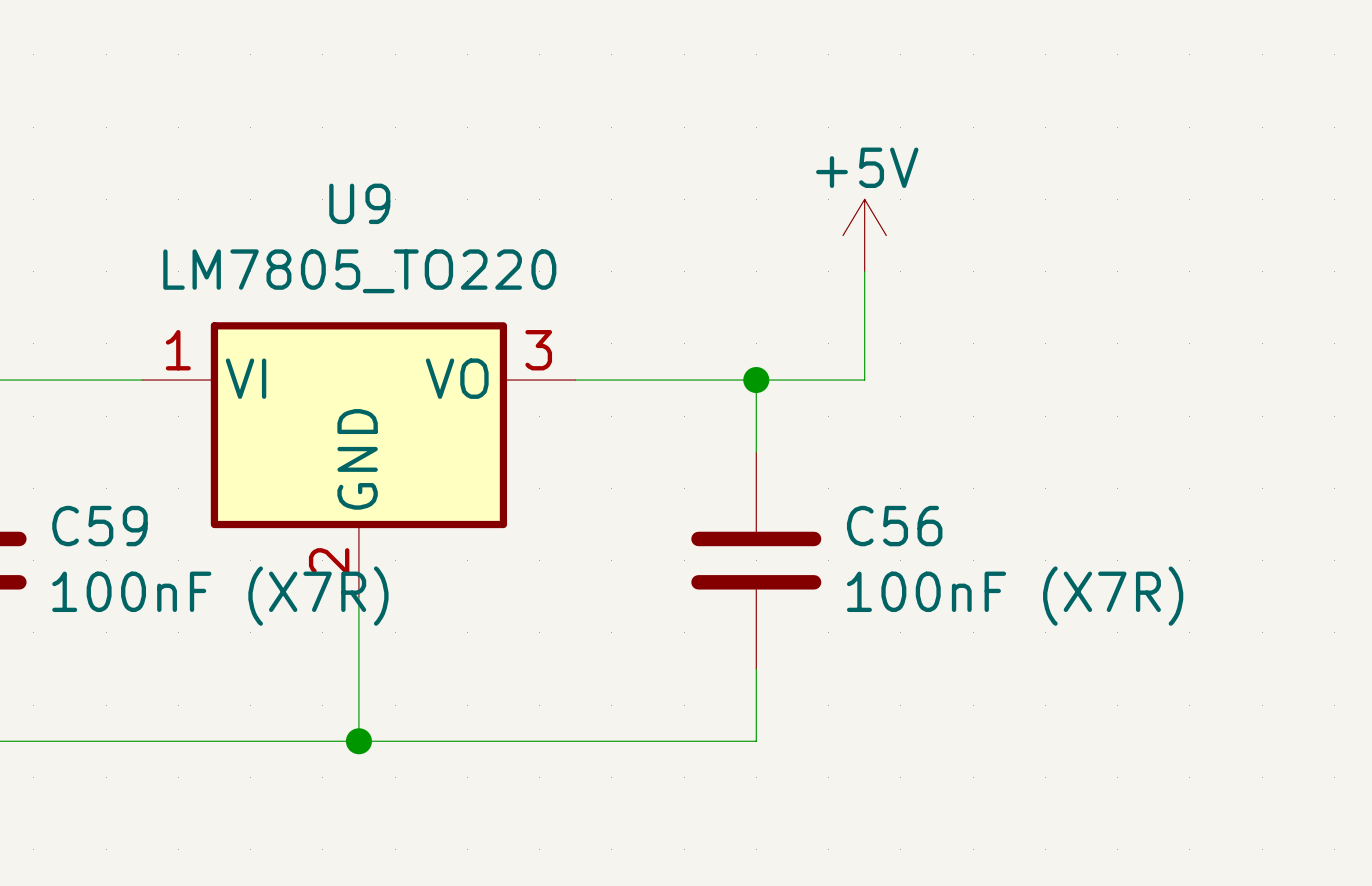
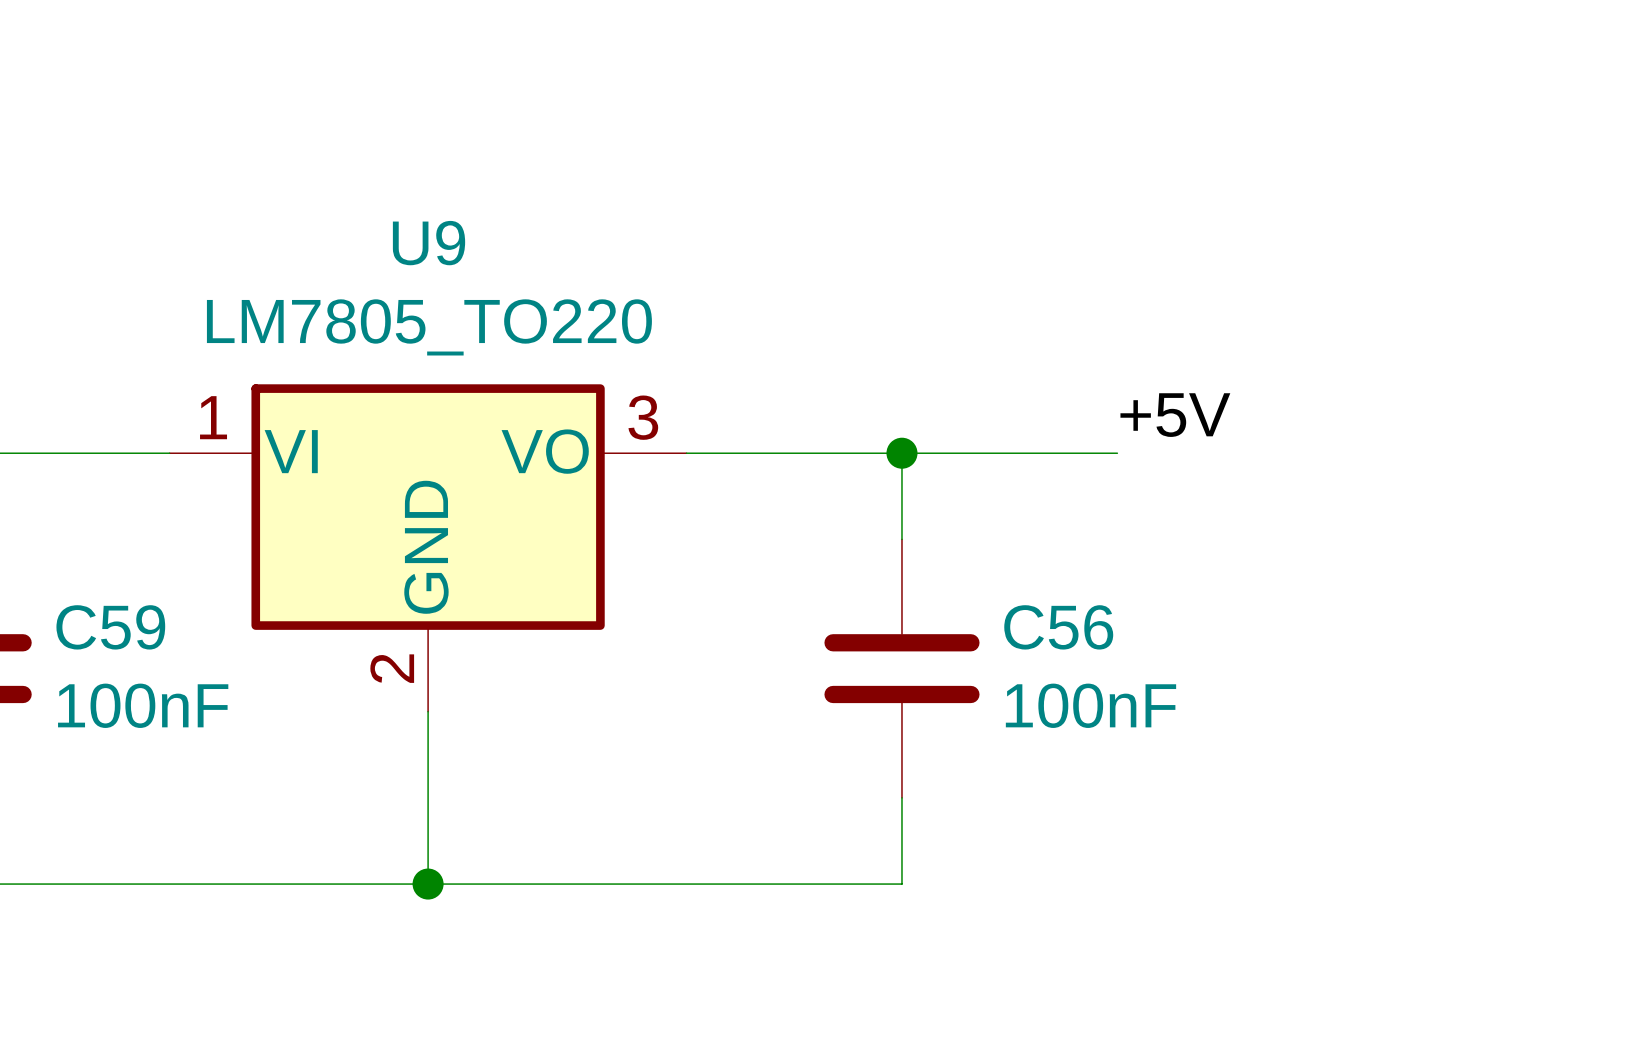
power symbol: +5V (864, 235) -> none
wire: (864, 271) (864, 380) -> (1117, 453) (1031, 453)
label: none -> +5V (1175, 415)
C59 value: 100nF (X7R) (220, 596) -> 100nF (143, 705)
C56 value: 100nF (X7R) (1015, 596) -> 100nF (1090, 705)

